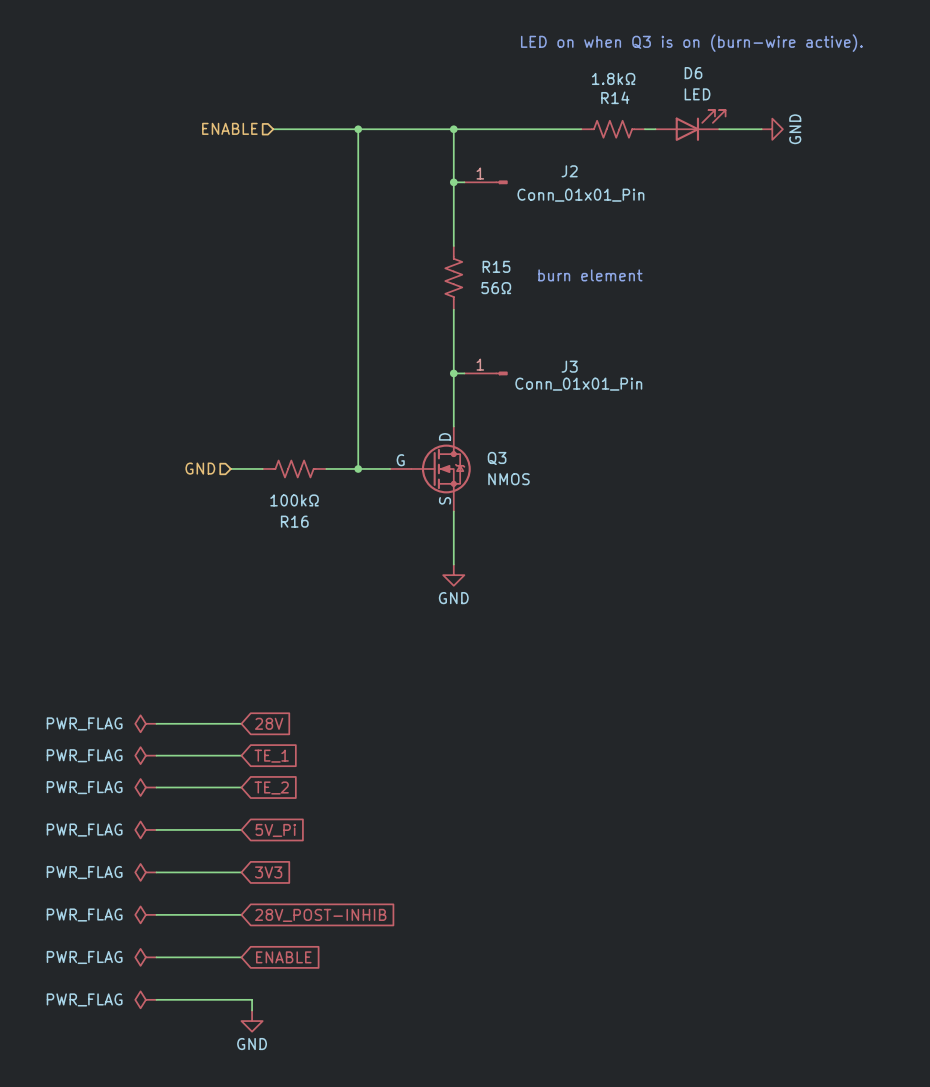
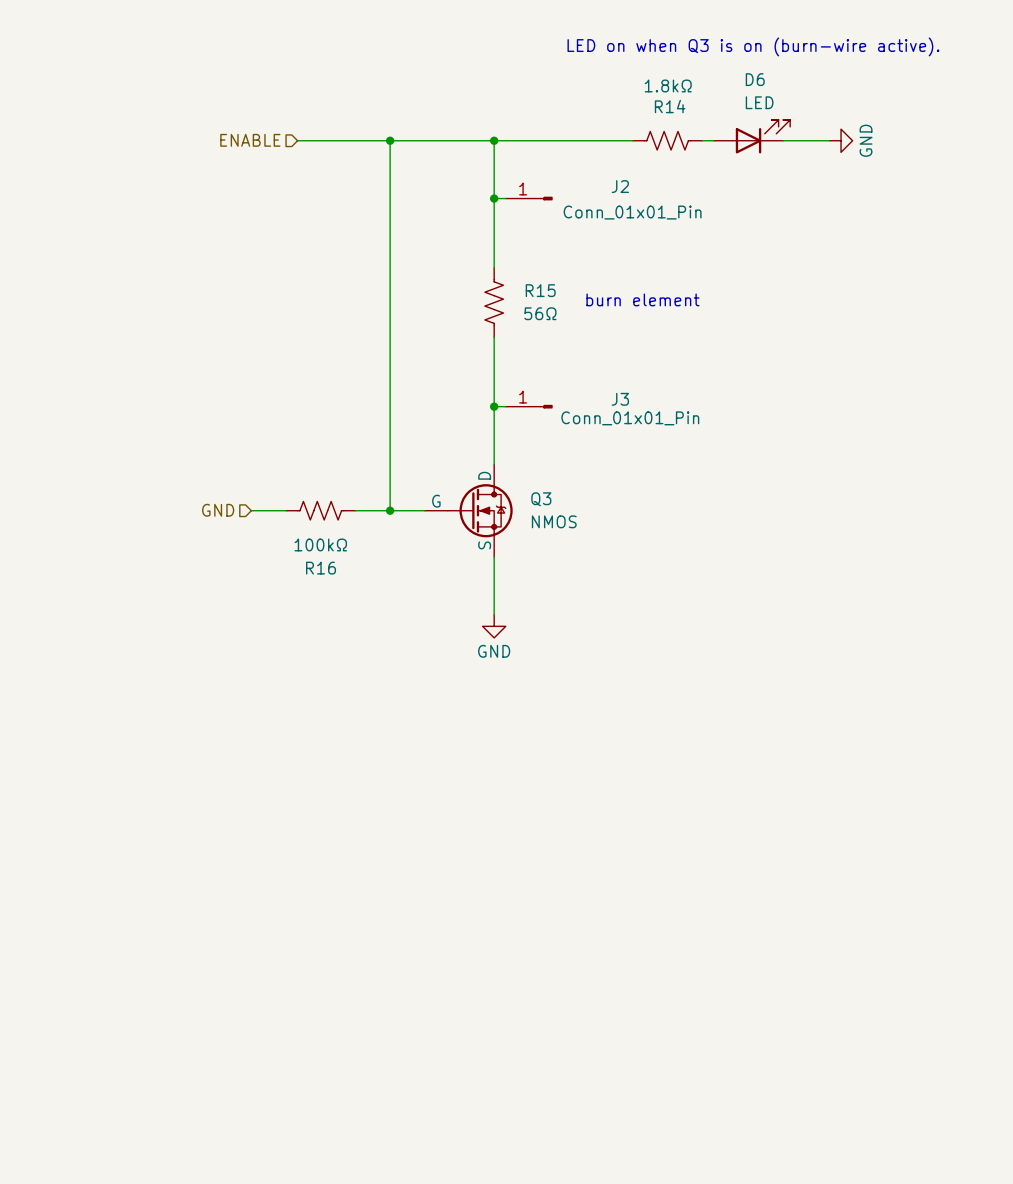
power symbol: PWR_FLAG (145, 723) -> none
wire: (156, 723) (241, 723) -> none
global label: 28V (269, 723) -> none
power symbol: PWR_FLAG (145, 755) -> none
wire: (156, 755) (241, 755) -> none
global label: TE_1 (271, 756) -> none
power symbol: PWR_FLAG (145, 787) -> none
wire: (156, 787) (241, 787) -> none
global label: TE_2 (271, 788) -> none
power symbol: PWR_FLAG (145, 829) -> none
wire: (156, 829) (241, 829) -> none
global label: 5V_Pi (275, 830) -> none
power symbol: PWR_FLAG (145, 872) -> none
wire: (156, 872) (241, 872) -> none
global label: 3V3 (268, 872) -> none
power symbol: PWR_FLAG (145, 914) -> none
wire: (156, 914) (241, 914) -> none
global label: 28V_POST-INHIB (320, 915) -> none
power symbol: PWR_FLAG (145, 957) -> none
wire: (156, 957) (241, 957) -> none
global label: ENABLE (283, 957) -> none
power symbol: PWR_FLAG (145, 999) -> none
wire: (156, 999) (252, 999) (252, 1010) -> none
power symbol: GND (252, 1021) -> none

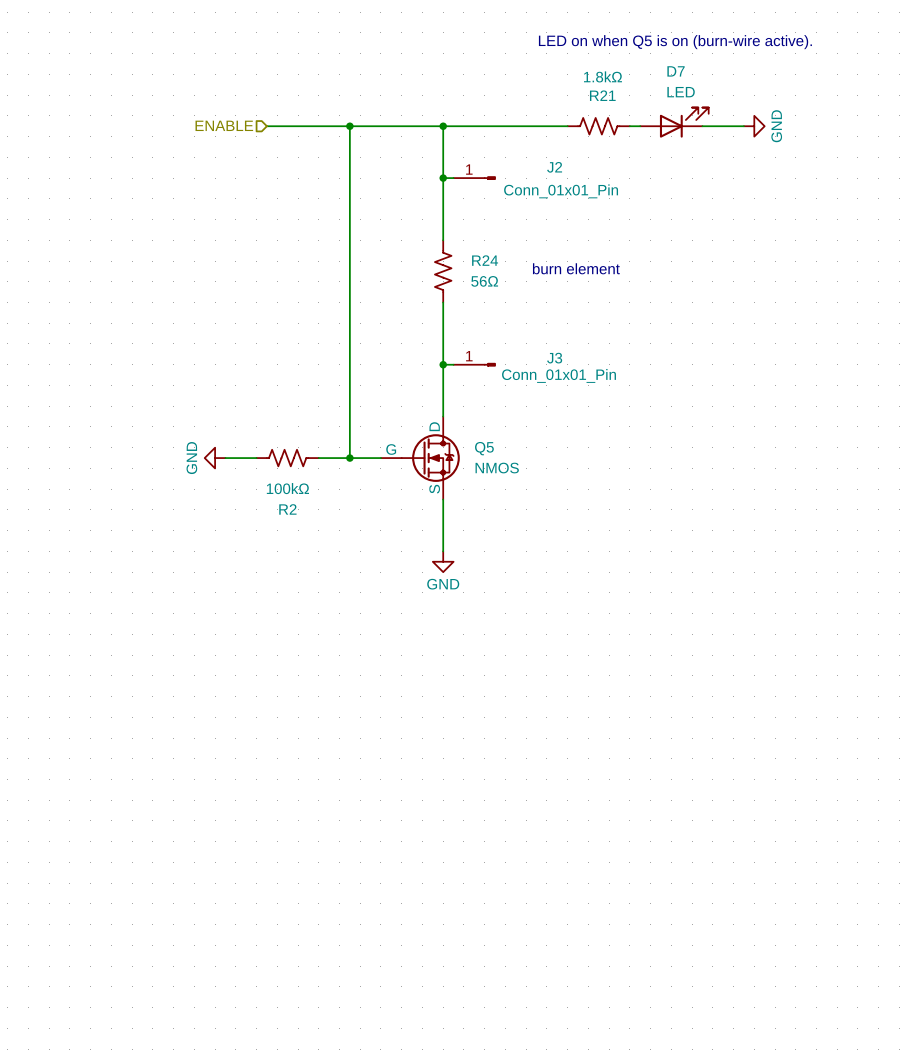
text: LED on when Q3 is on (burn-wire active). (753, 46) -> LED on when Q5 is on (burn-wire active). (675, 42)
D6 name: D6 (755, 79) -> D7 (676, 71)
R14 name: R14 (670, 106) -> R21 (602, 95)
R15 name: R15 (540, 290) -> R24 (485, 260)
Q3 name: Q3 (541, 499) -> Q5 (484, 448)
hierarchical label: GND (218, 510) -> none
power symbol: none -> GND (215, 458)
R16 name: R16 (321, 568) -> R2 (287, 509)

